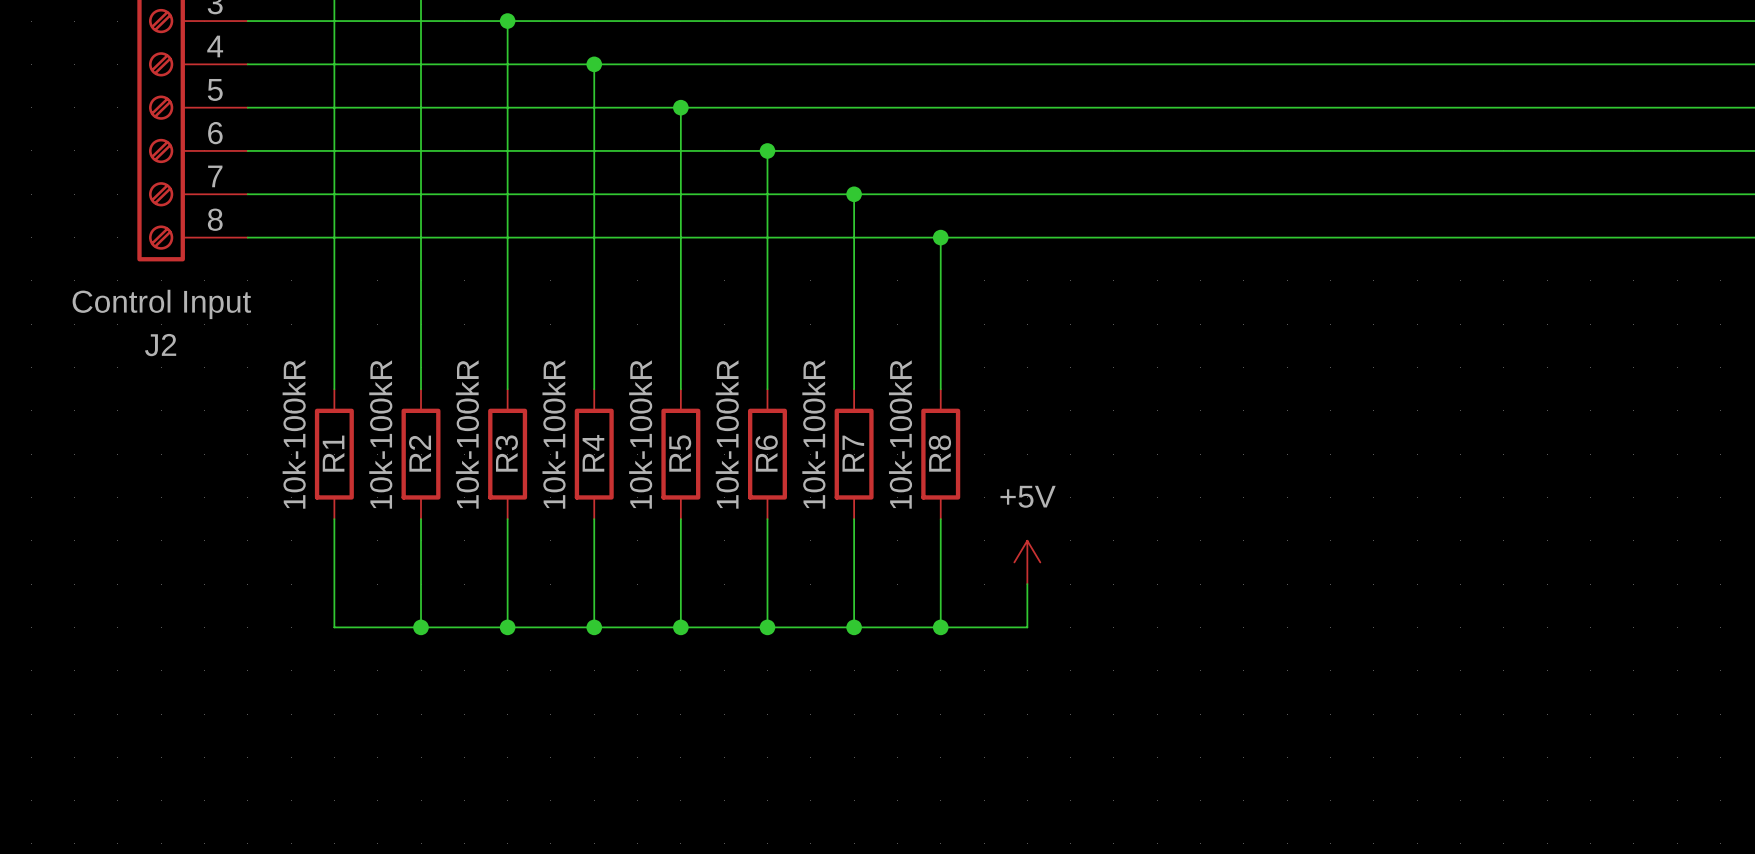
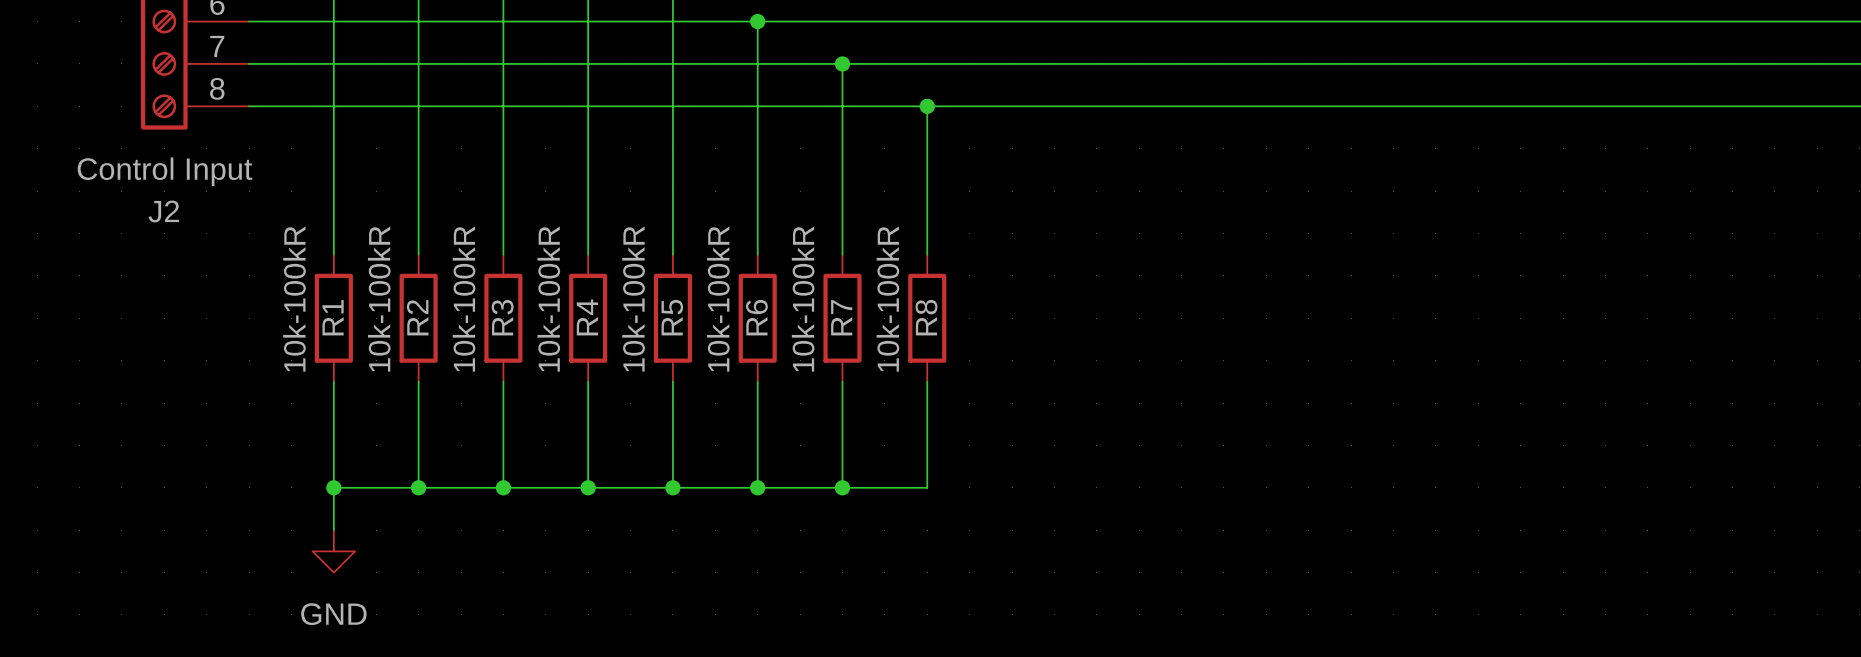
power symbol: +5V (1027, 562) -> none
wire: (1027, 584) (1027, 627) (940, 627) -> none
wire: none -> (333, 487) (333, 530)
junction: none -> (333, 487)
junction: (940, 627) -> none
power symbol: none -> GND (333, 551)

